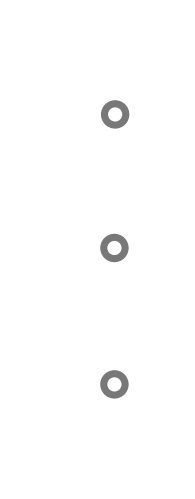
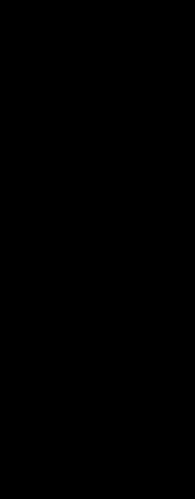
via: (115, 114) -> none
via: (114, 247) -> none
via: (114, 384) -> none

